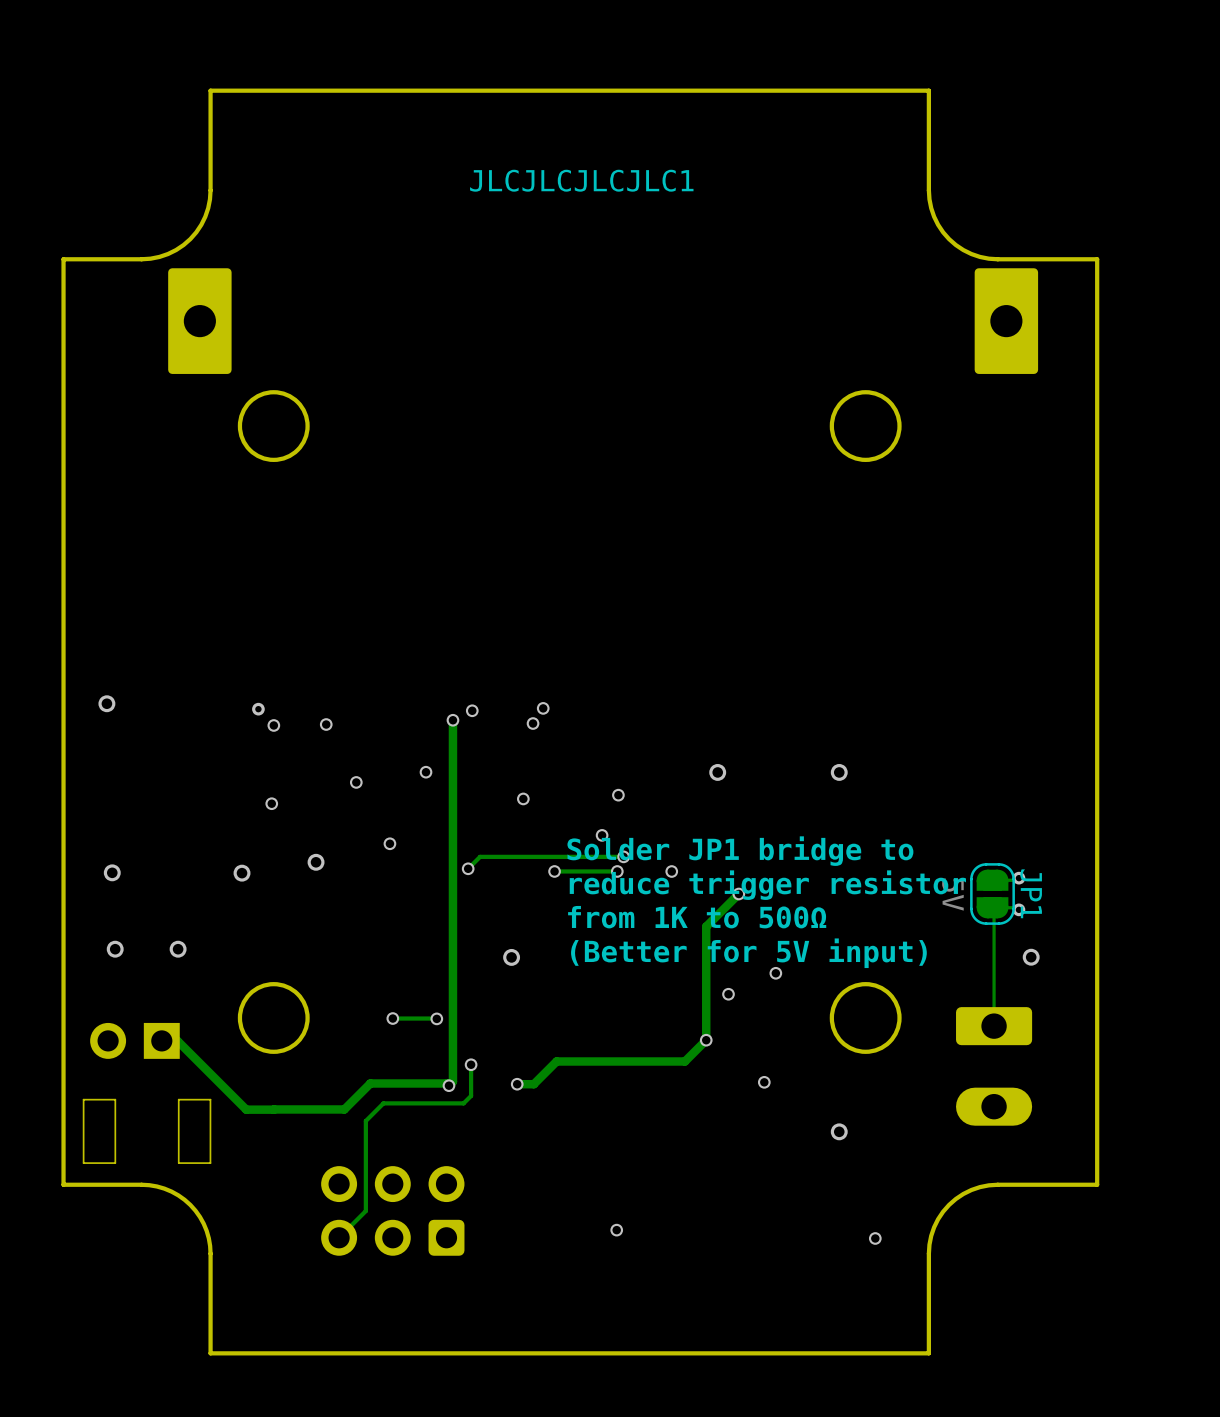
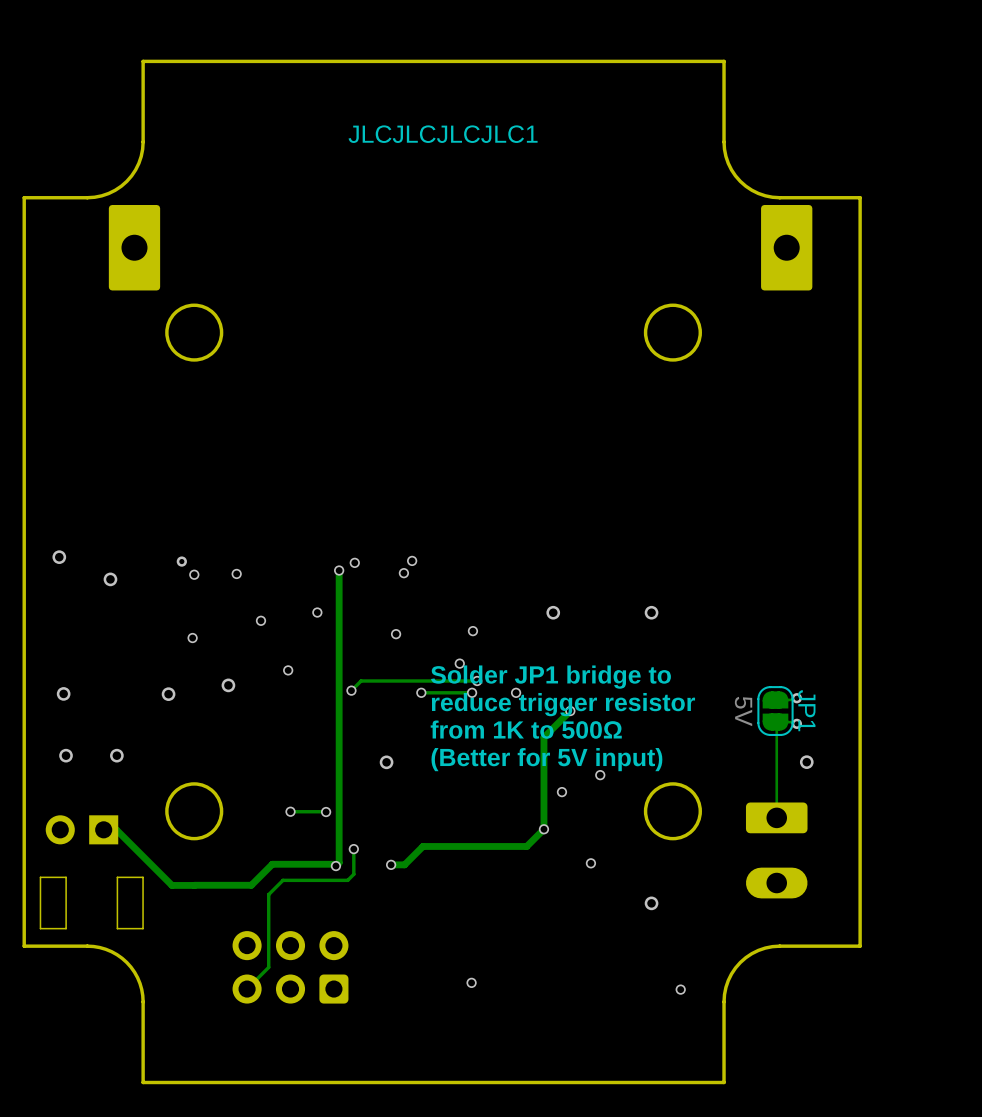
via: none -> (110, 579)

